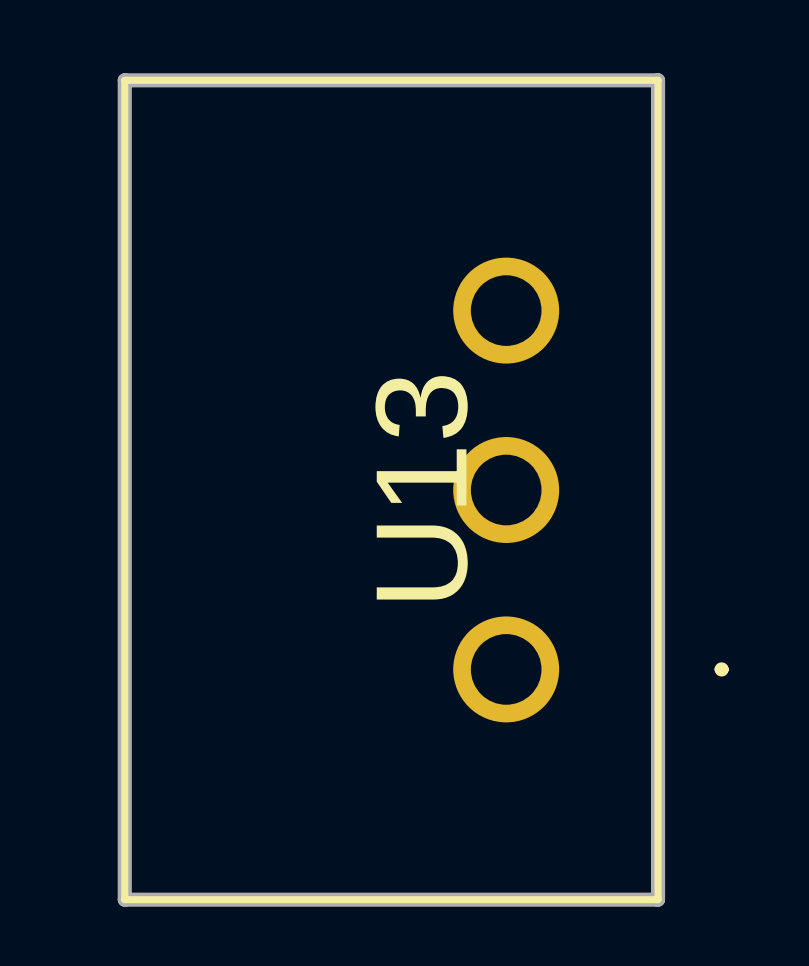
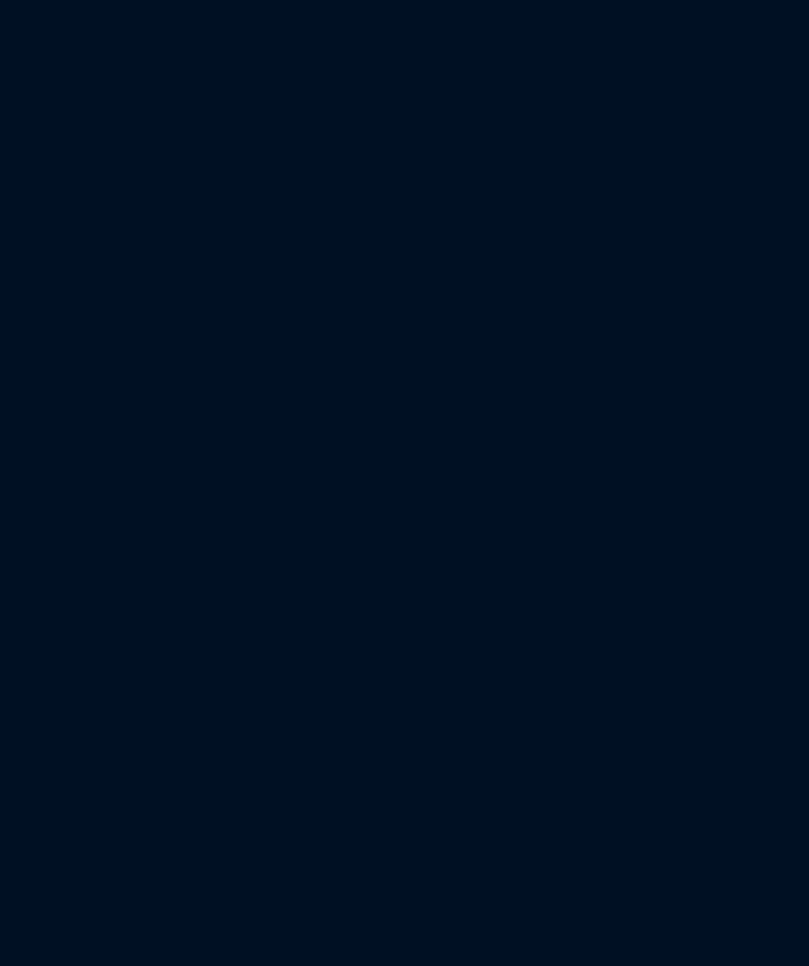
U13: (423, 490) -> none

